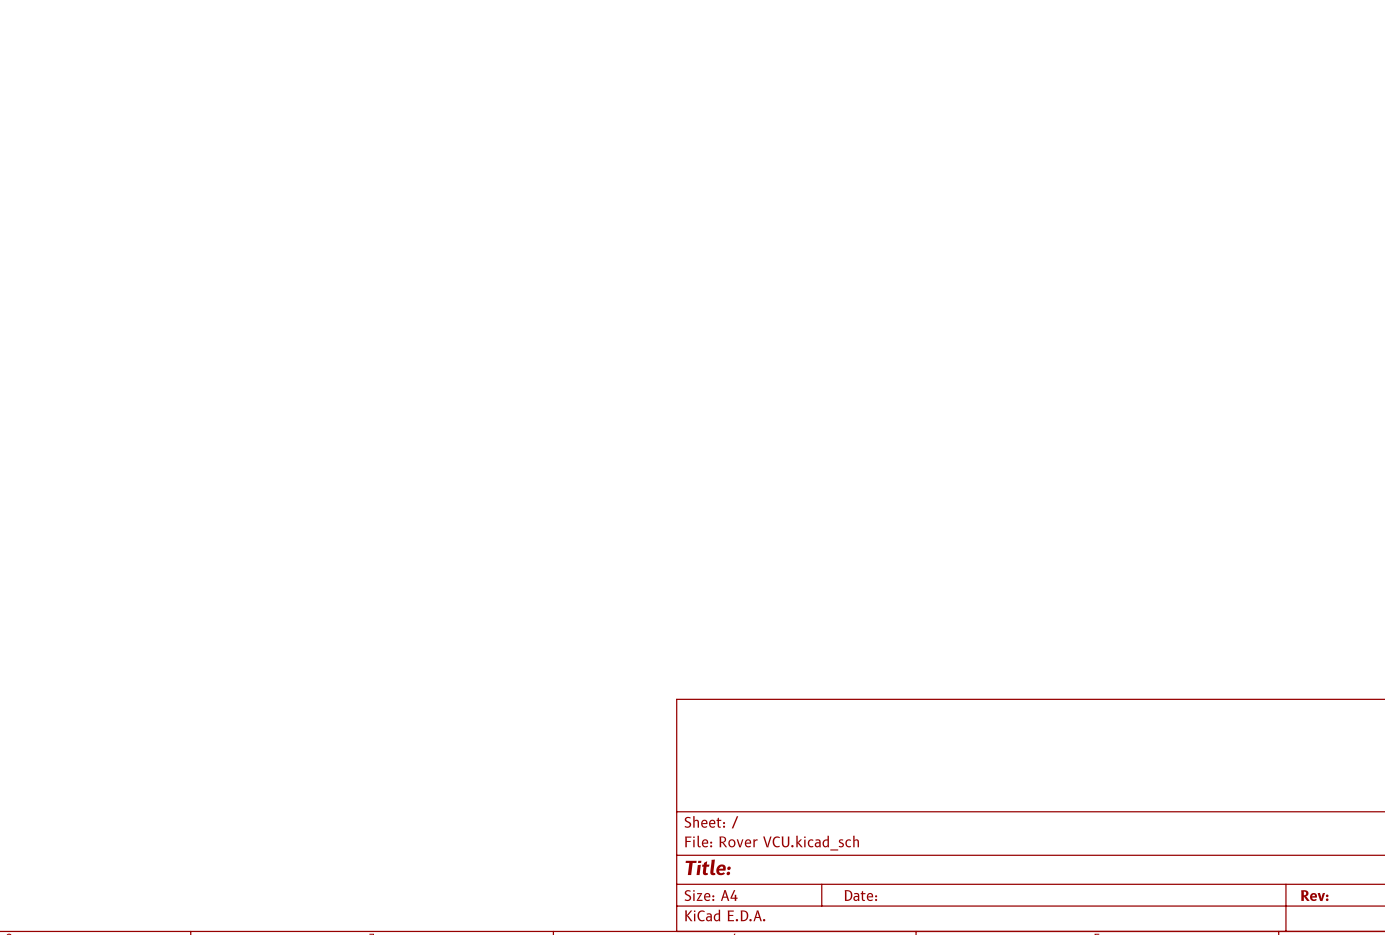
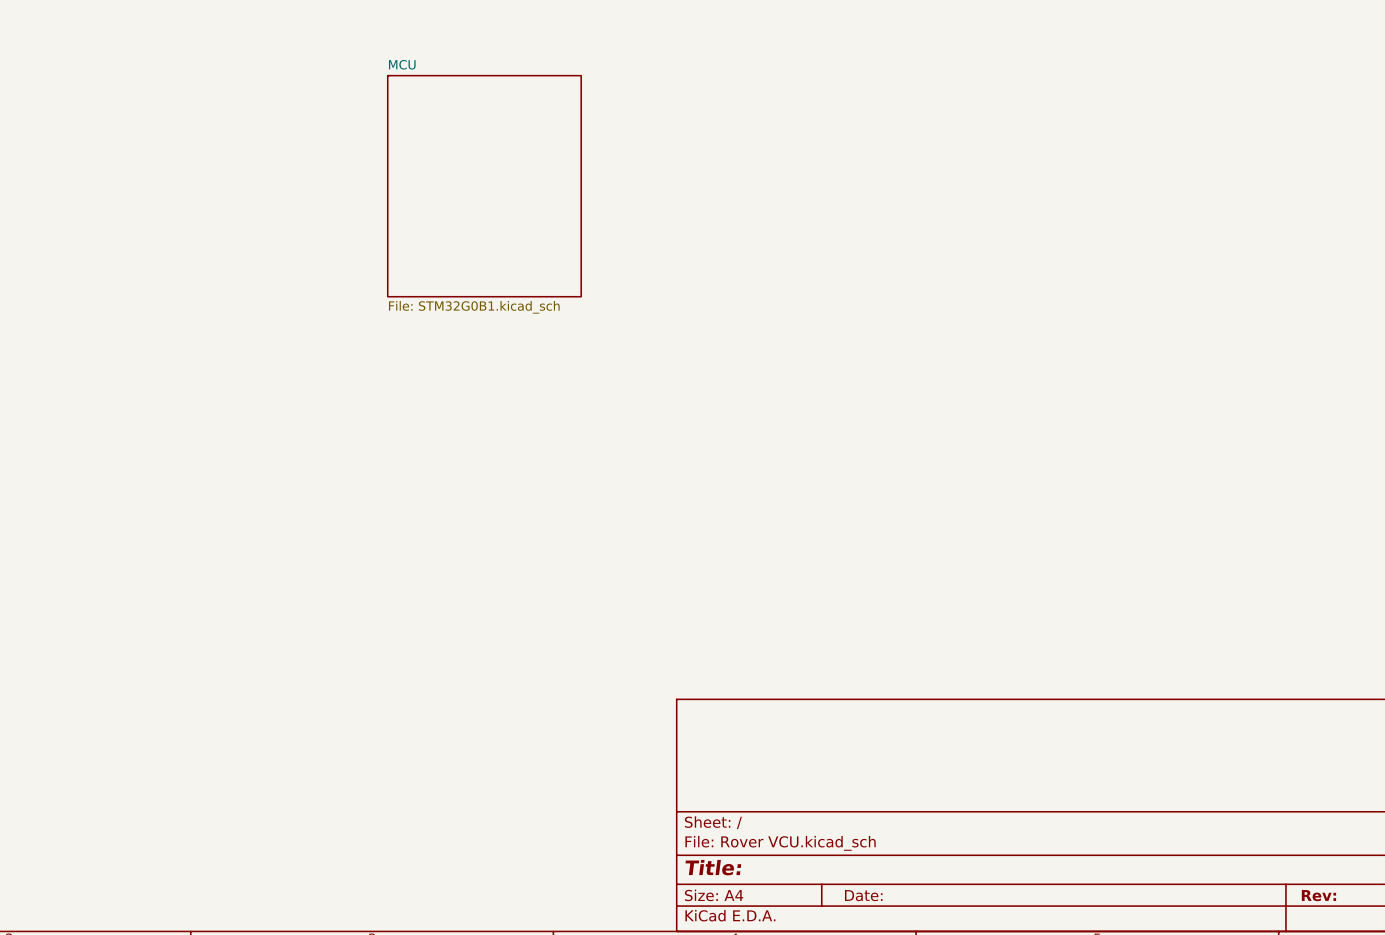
sheet MCU: none -> File: STM32G0B1.kicad_sch (484, 186)

